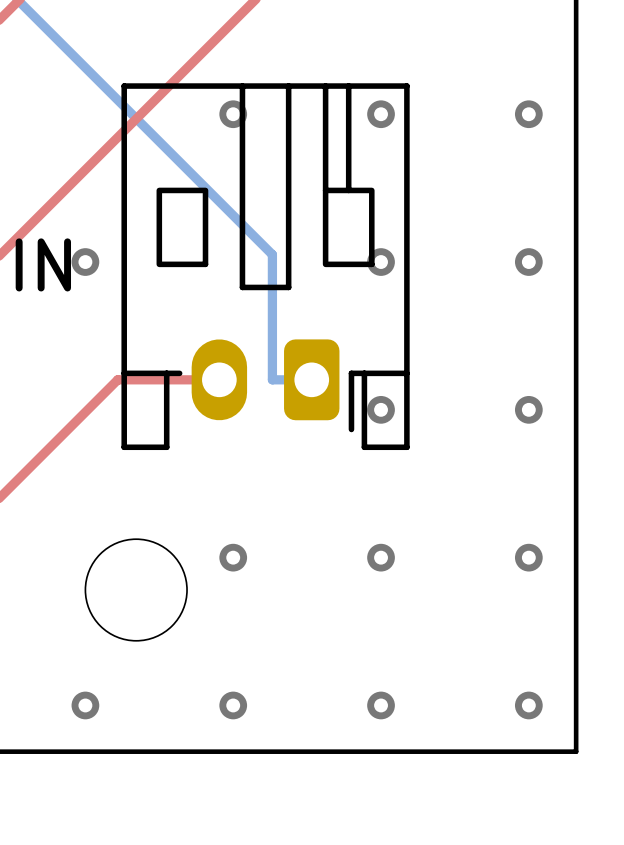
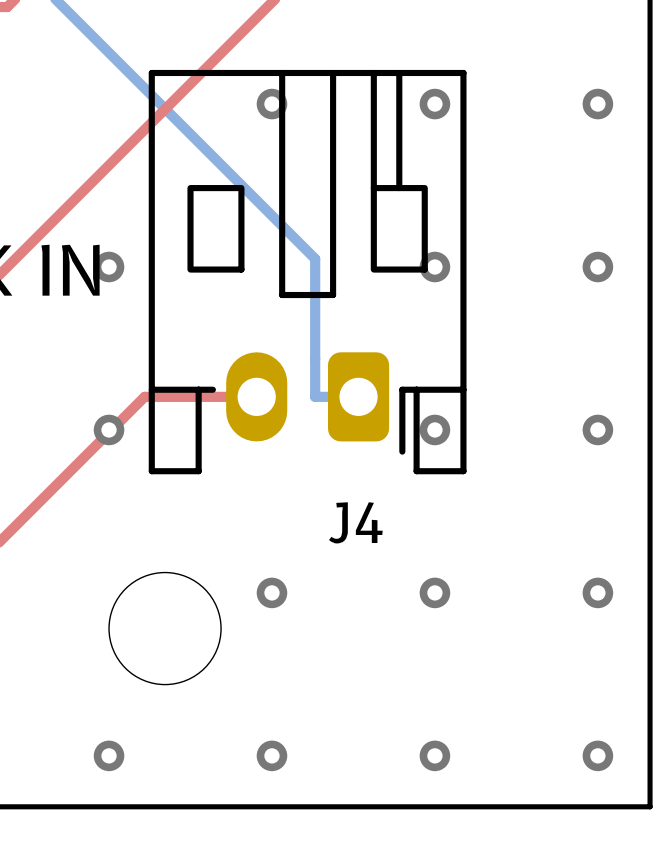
via: none -> (109, 429)
J4 name: none -> J4 (355, 522)

